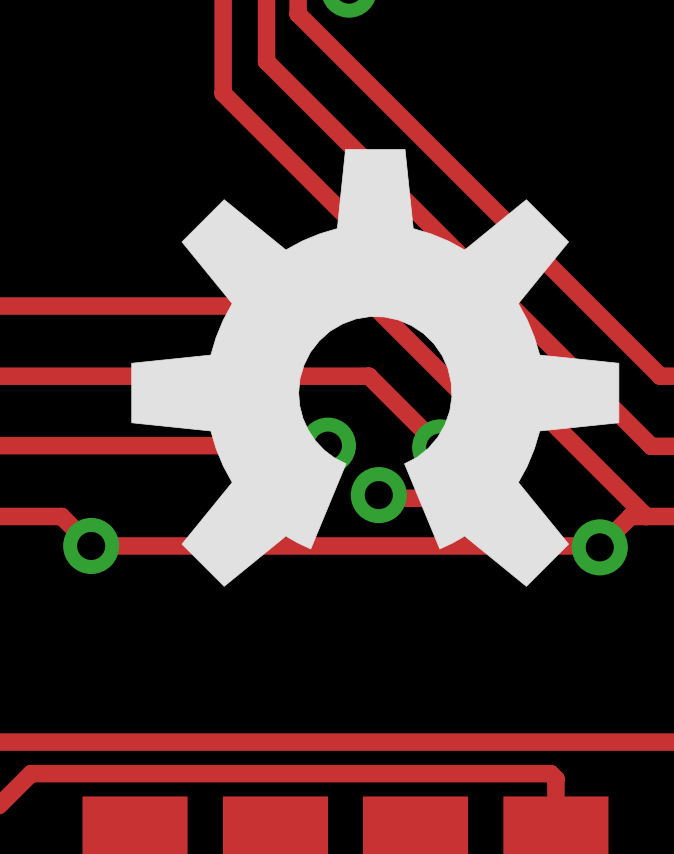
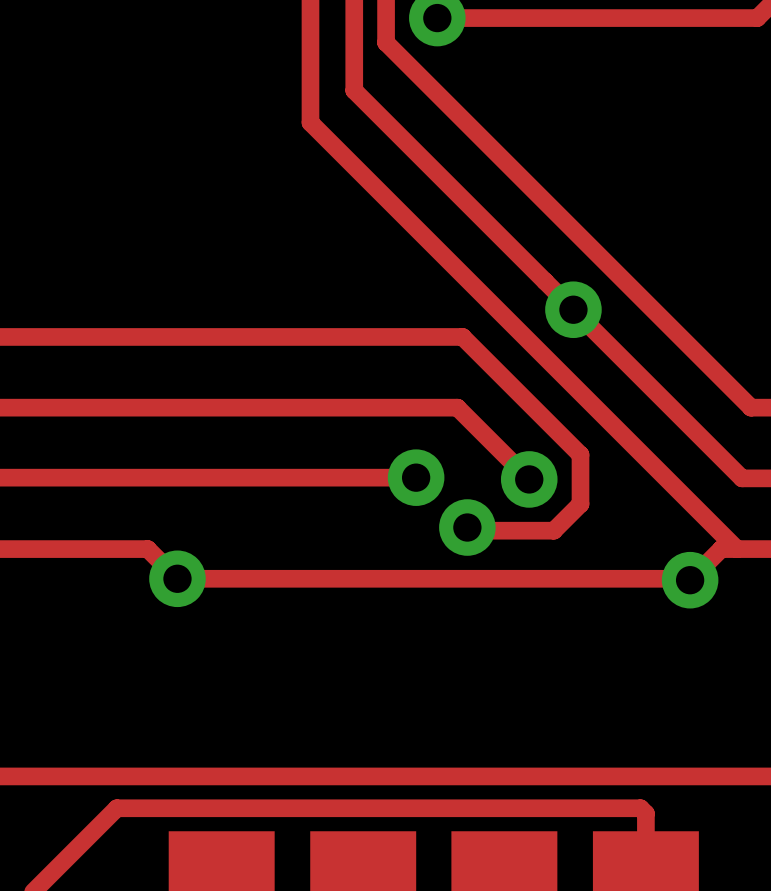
drawing: [131, 149, 620, 587] -> none

